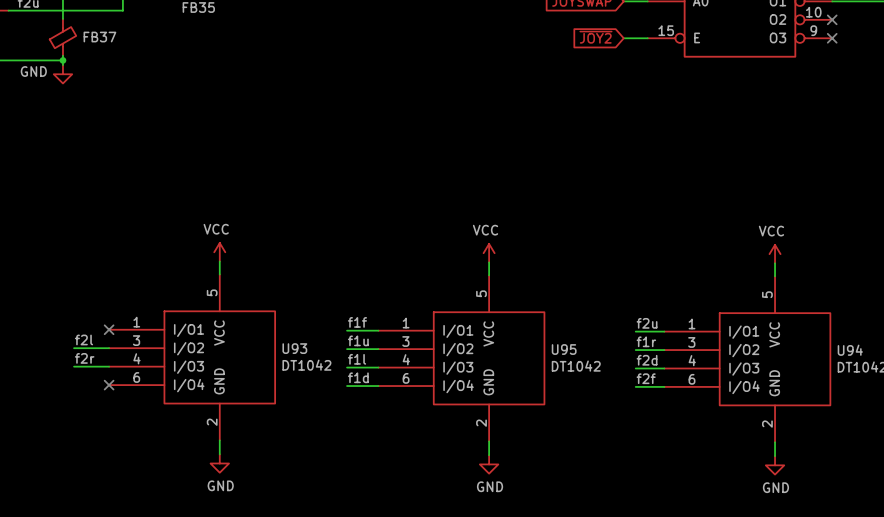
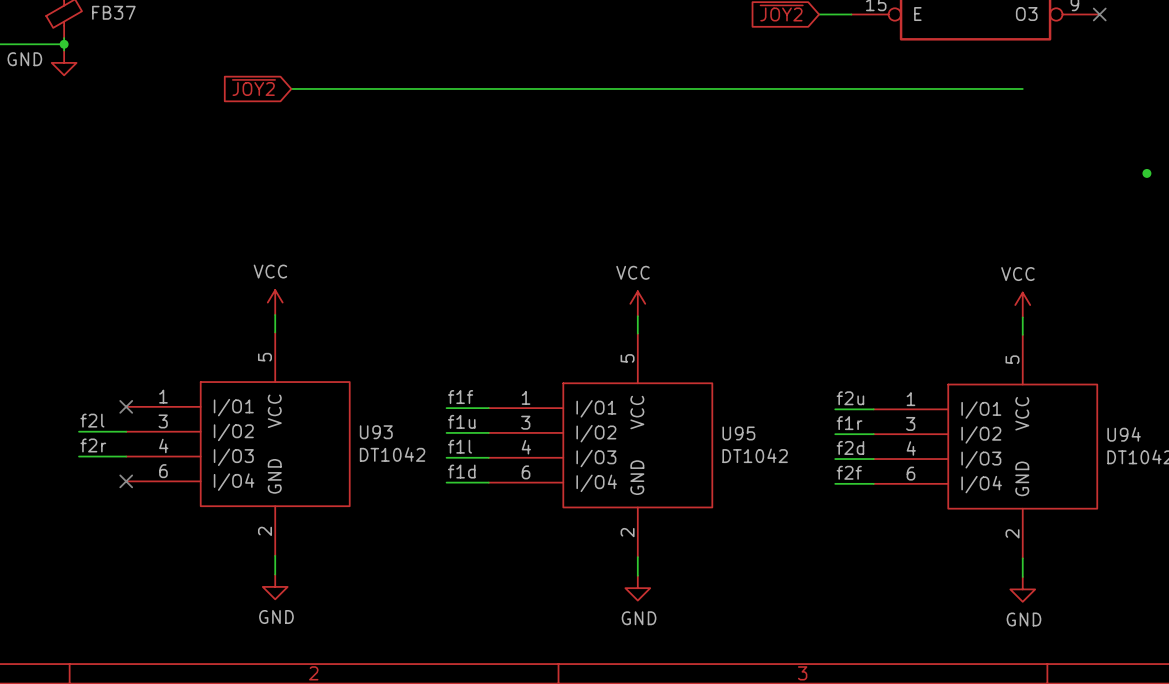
global label: none -> ~{JOY2} (253, 87)
wire: none -> (291, 88) (1022, 88)
junction: none -> (1146, 173)

